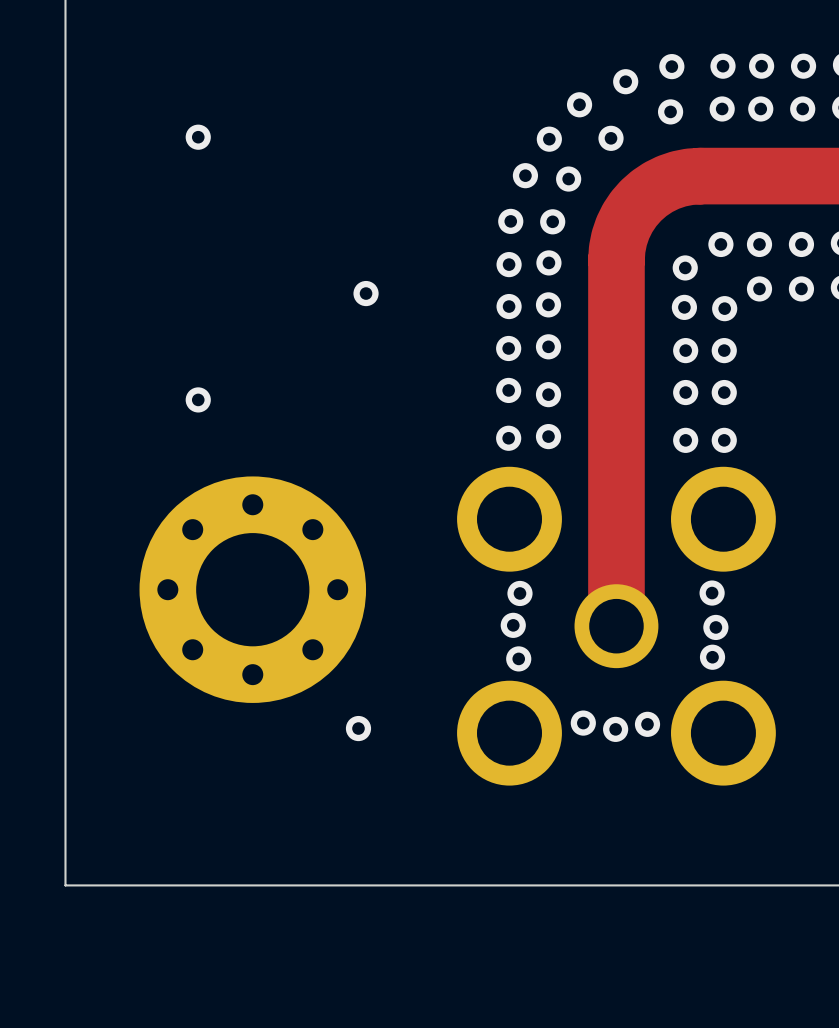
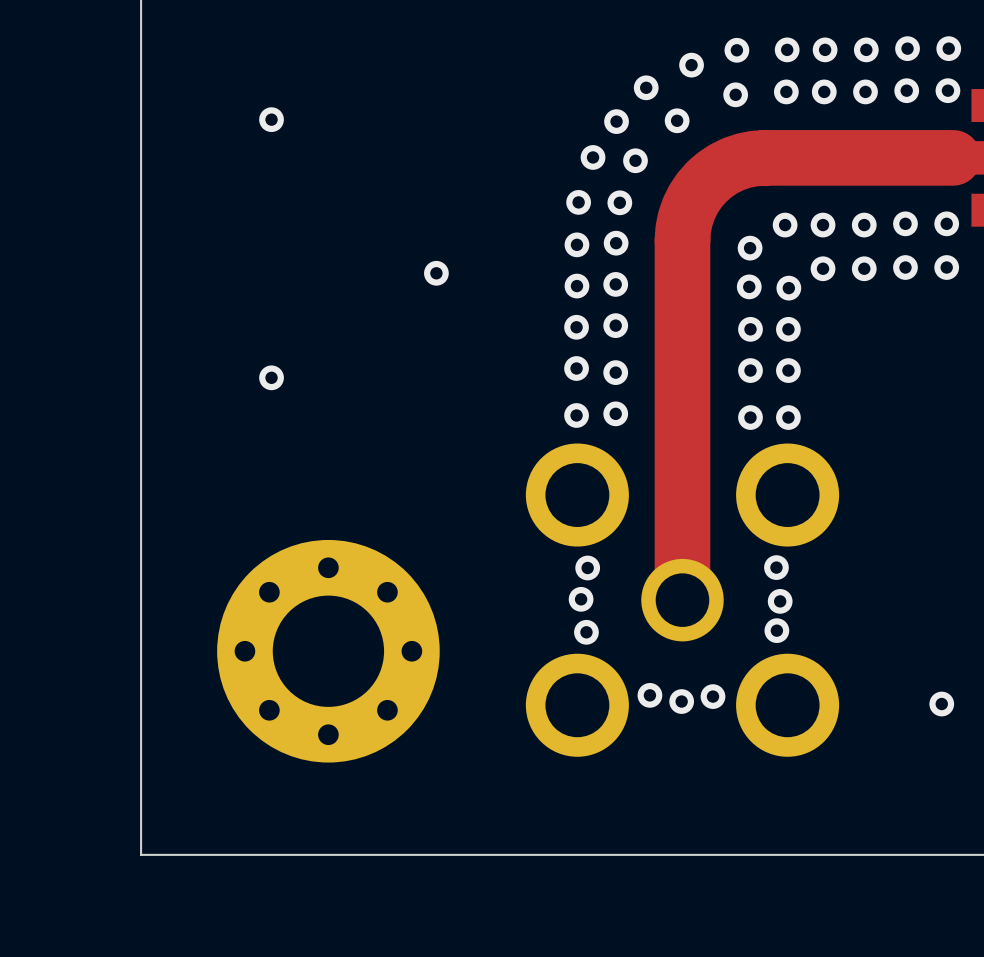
part position: (252, 589) -> (328, 651)
via: (358, 728) -> none

